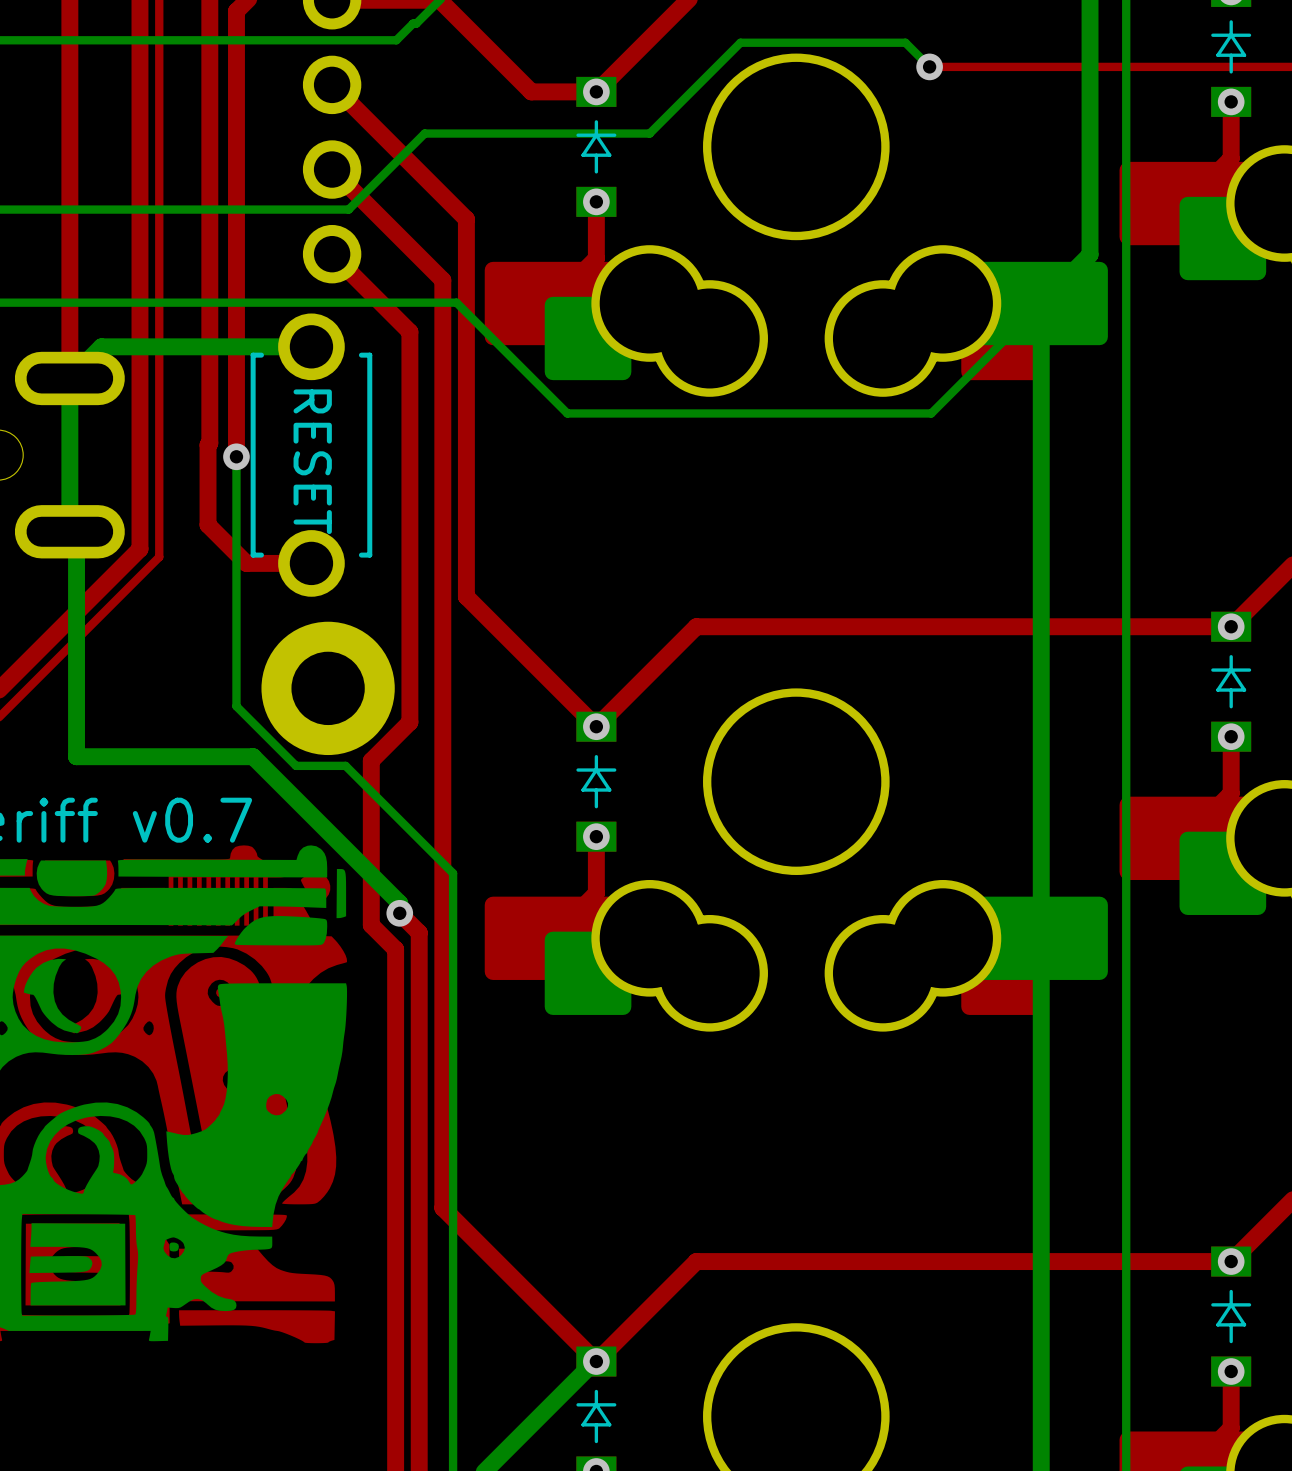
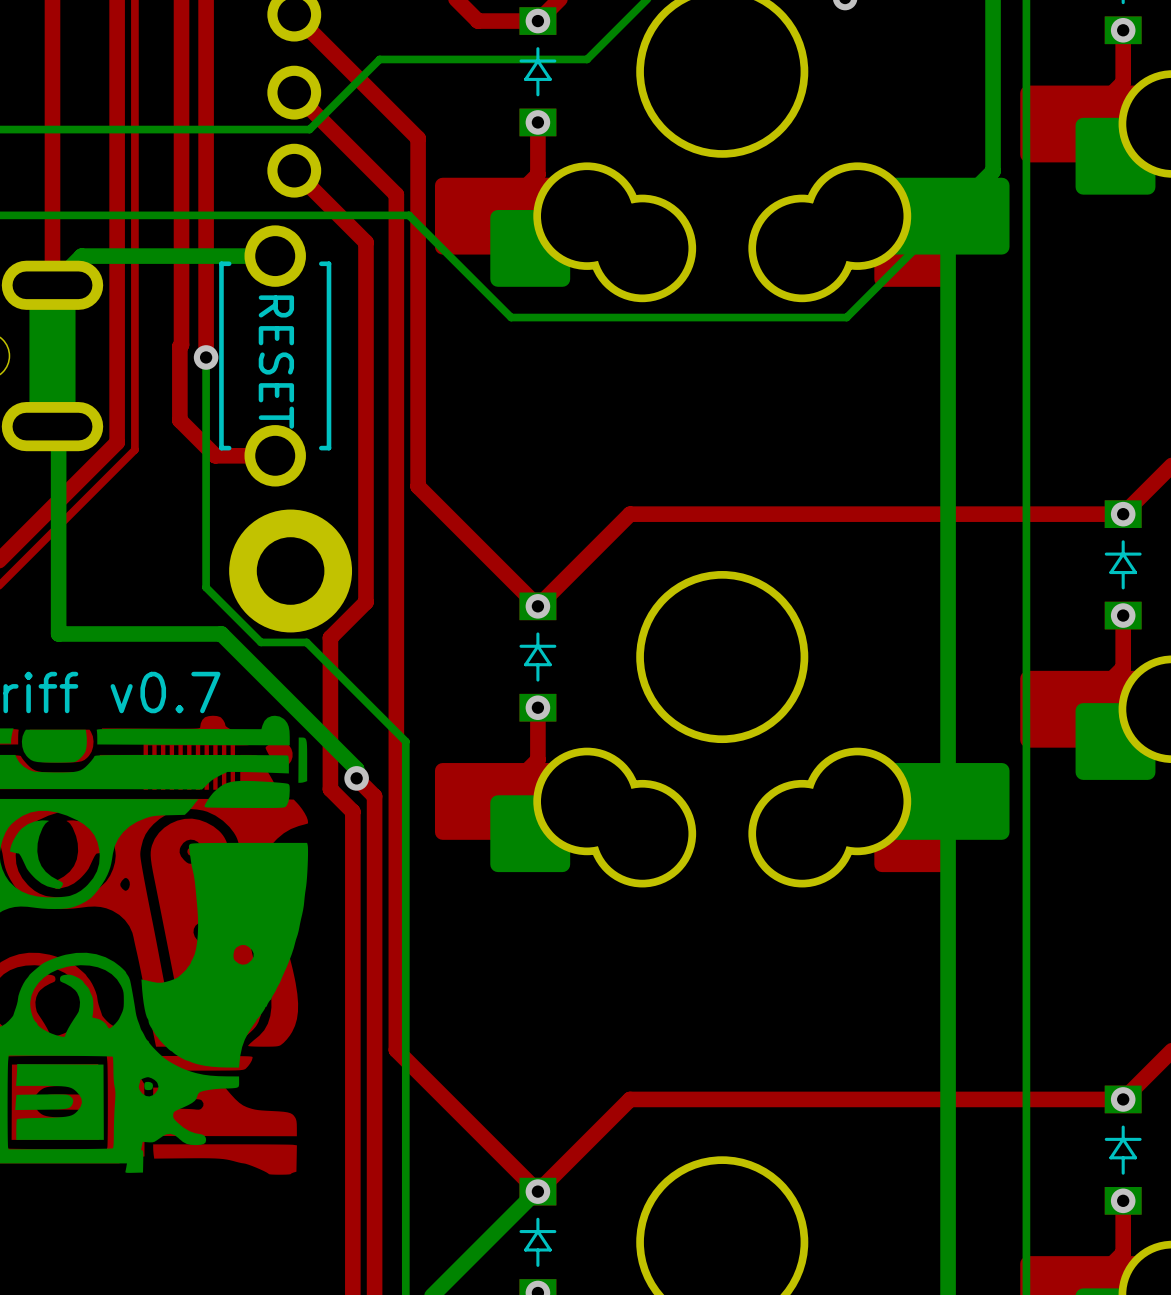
bottom track width: thin (69, 378) (69, 531) -> thick (52, 285) (52, 426)

